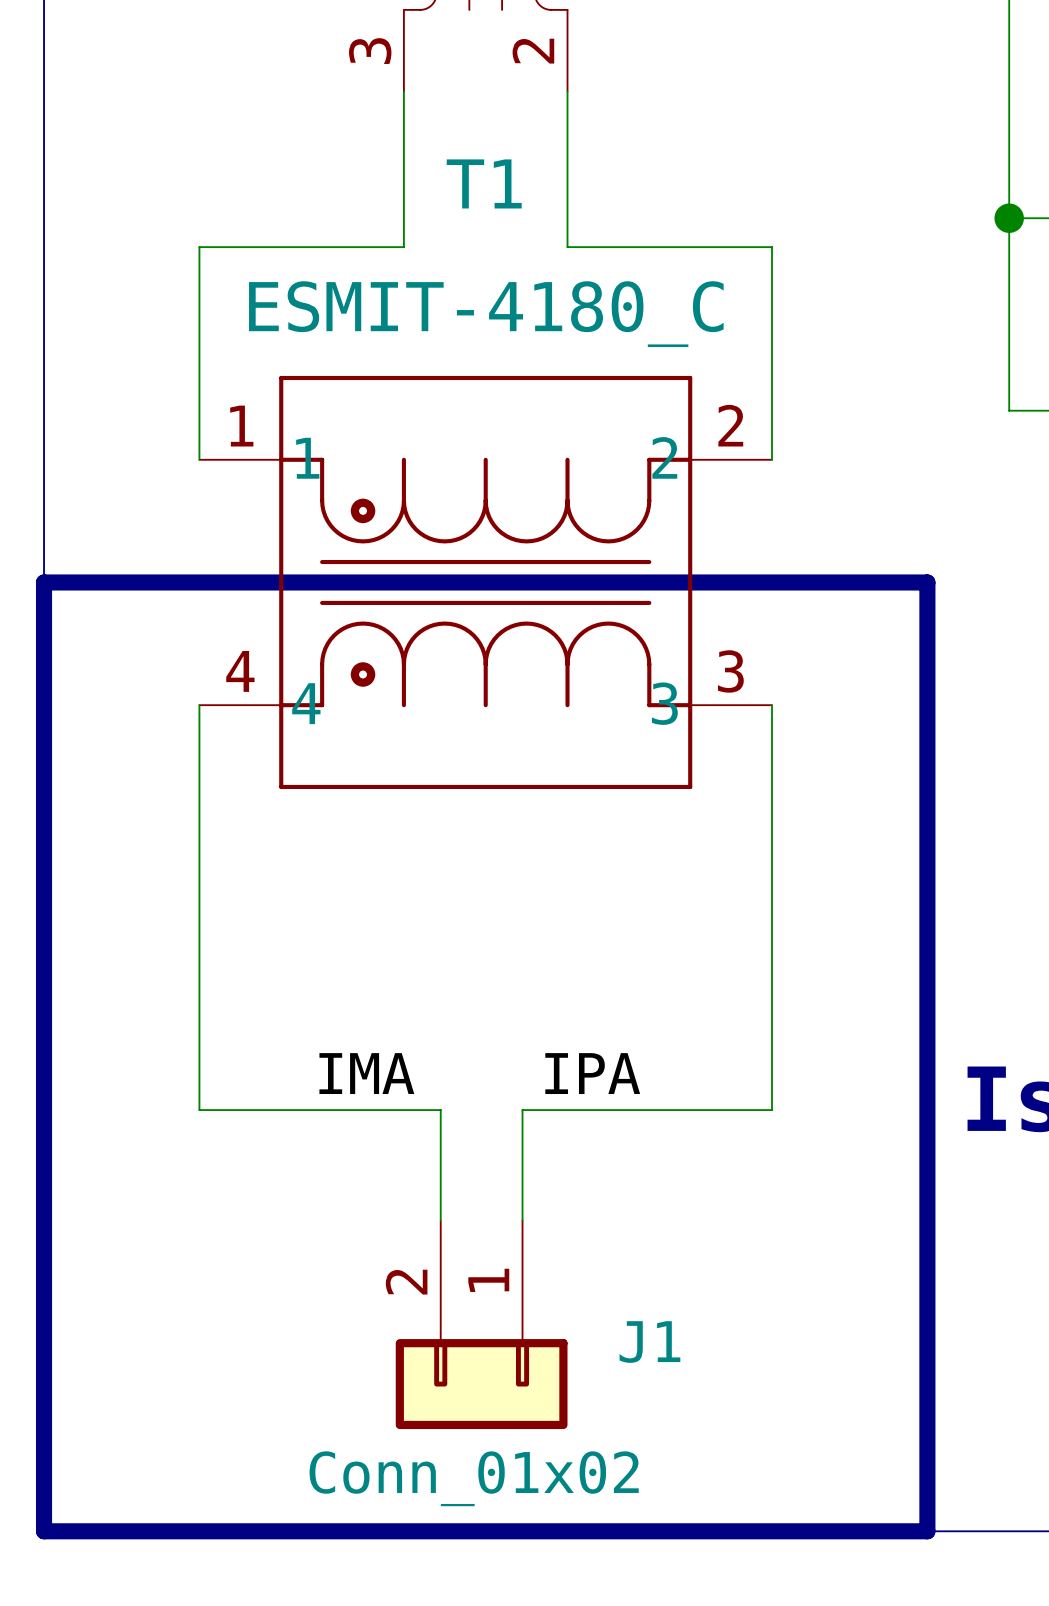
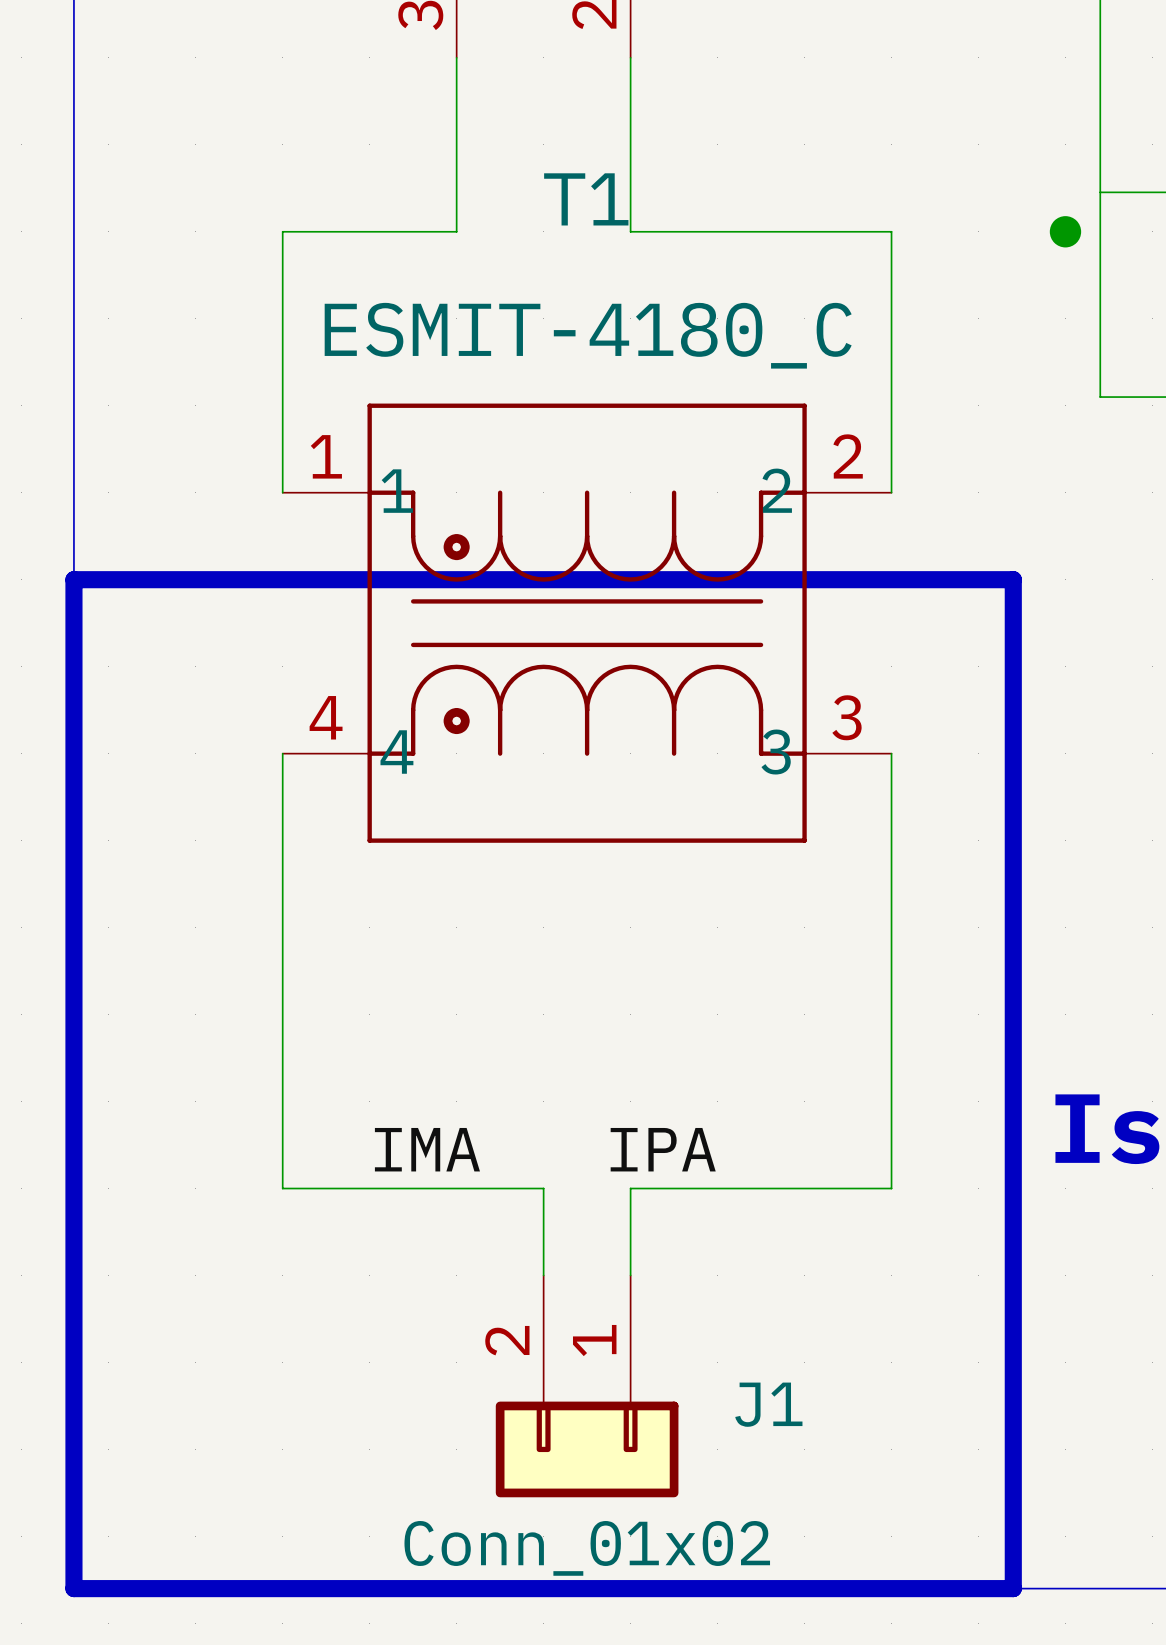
junction position: (1009, 218) -> (1065, 231)
wire: (403, 247) (199, 247) (199, 459) -> (456, 223) (456, 231) (282, 231) (282, 492)
wire: (567, 247) (771, 247) (771, 459) -> (630, 223) (630, 231) (891, 231) (891, 492)
T1 position: (485, 582) -> (587, 623)
wire: (199, 705) (199, 1110) (440, 1110) (440, 1220) -> none
wire: (771, 705) (771, 1110) (522, 1110) (522, 1220) -> none
wire: none -> (282, 753) (282, 1188) (543, 1188) (543, 1275)
wire: none -> (891, 753) (891, 1188) (630, 1188) (630, 1275)
label position: IMA (366, 1073) -> IMA (427, 1149)
label position: IPA (592, 1073) -> IPA (663, 1149)
J1 position: (481, 1324) -> (587, 1386)

